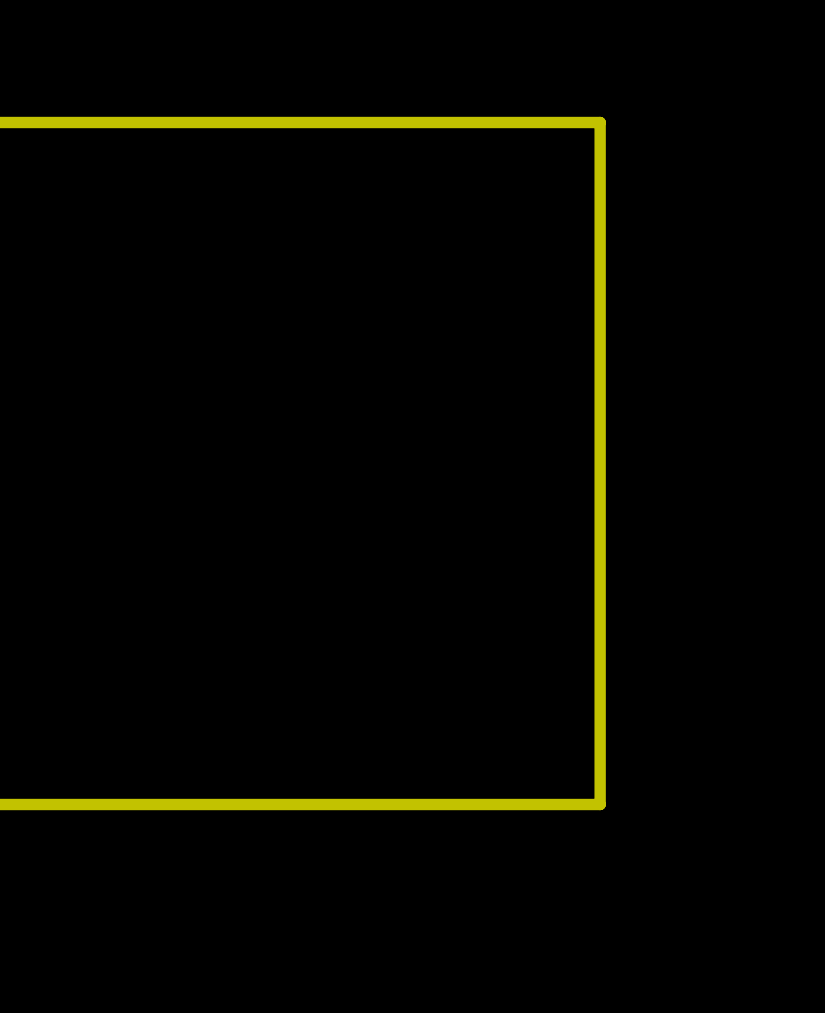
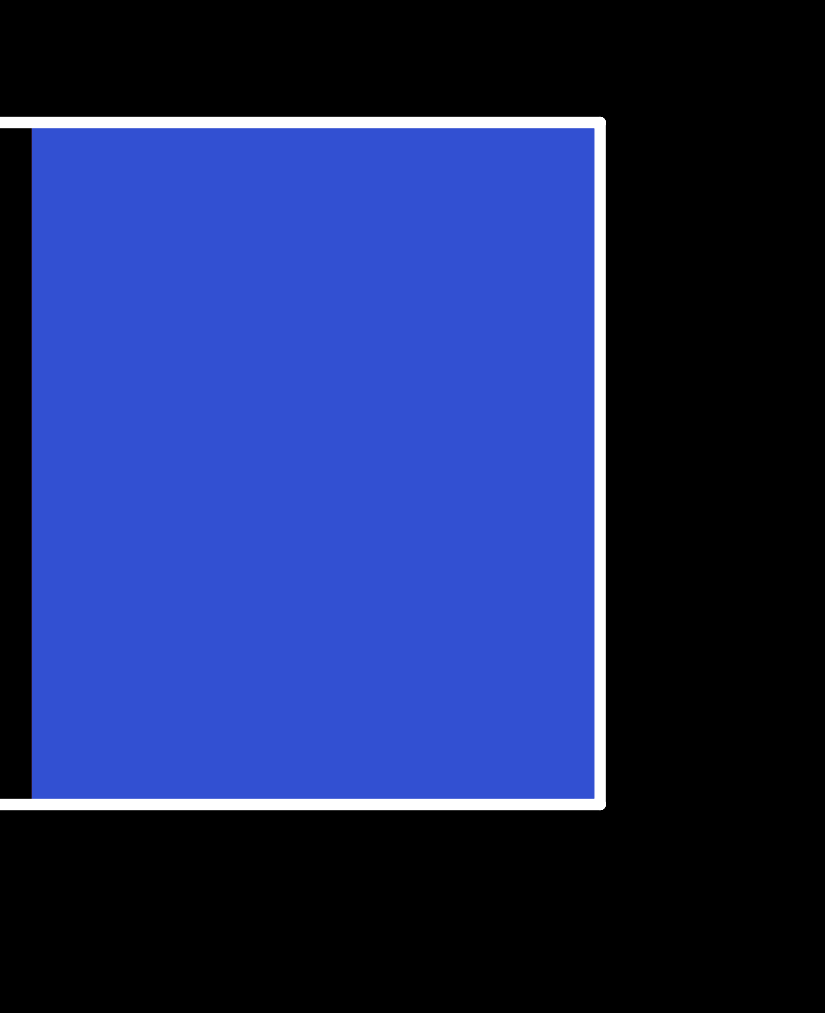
drawing: none -> [31, 122, 601, 805]

